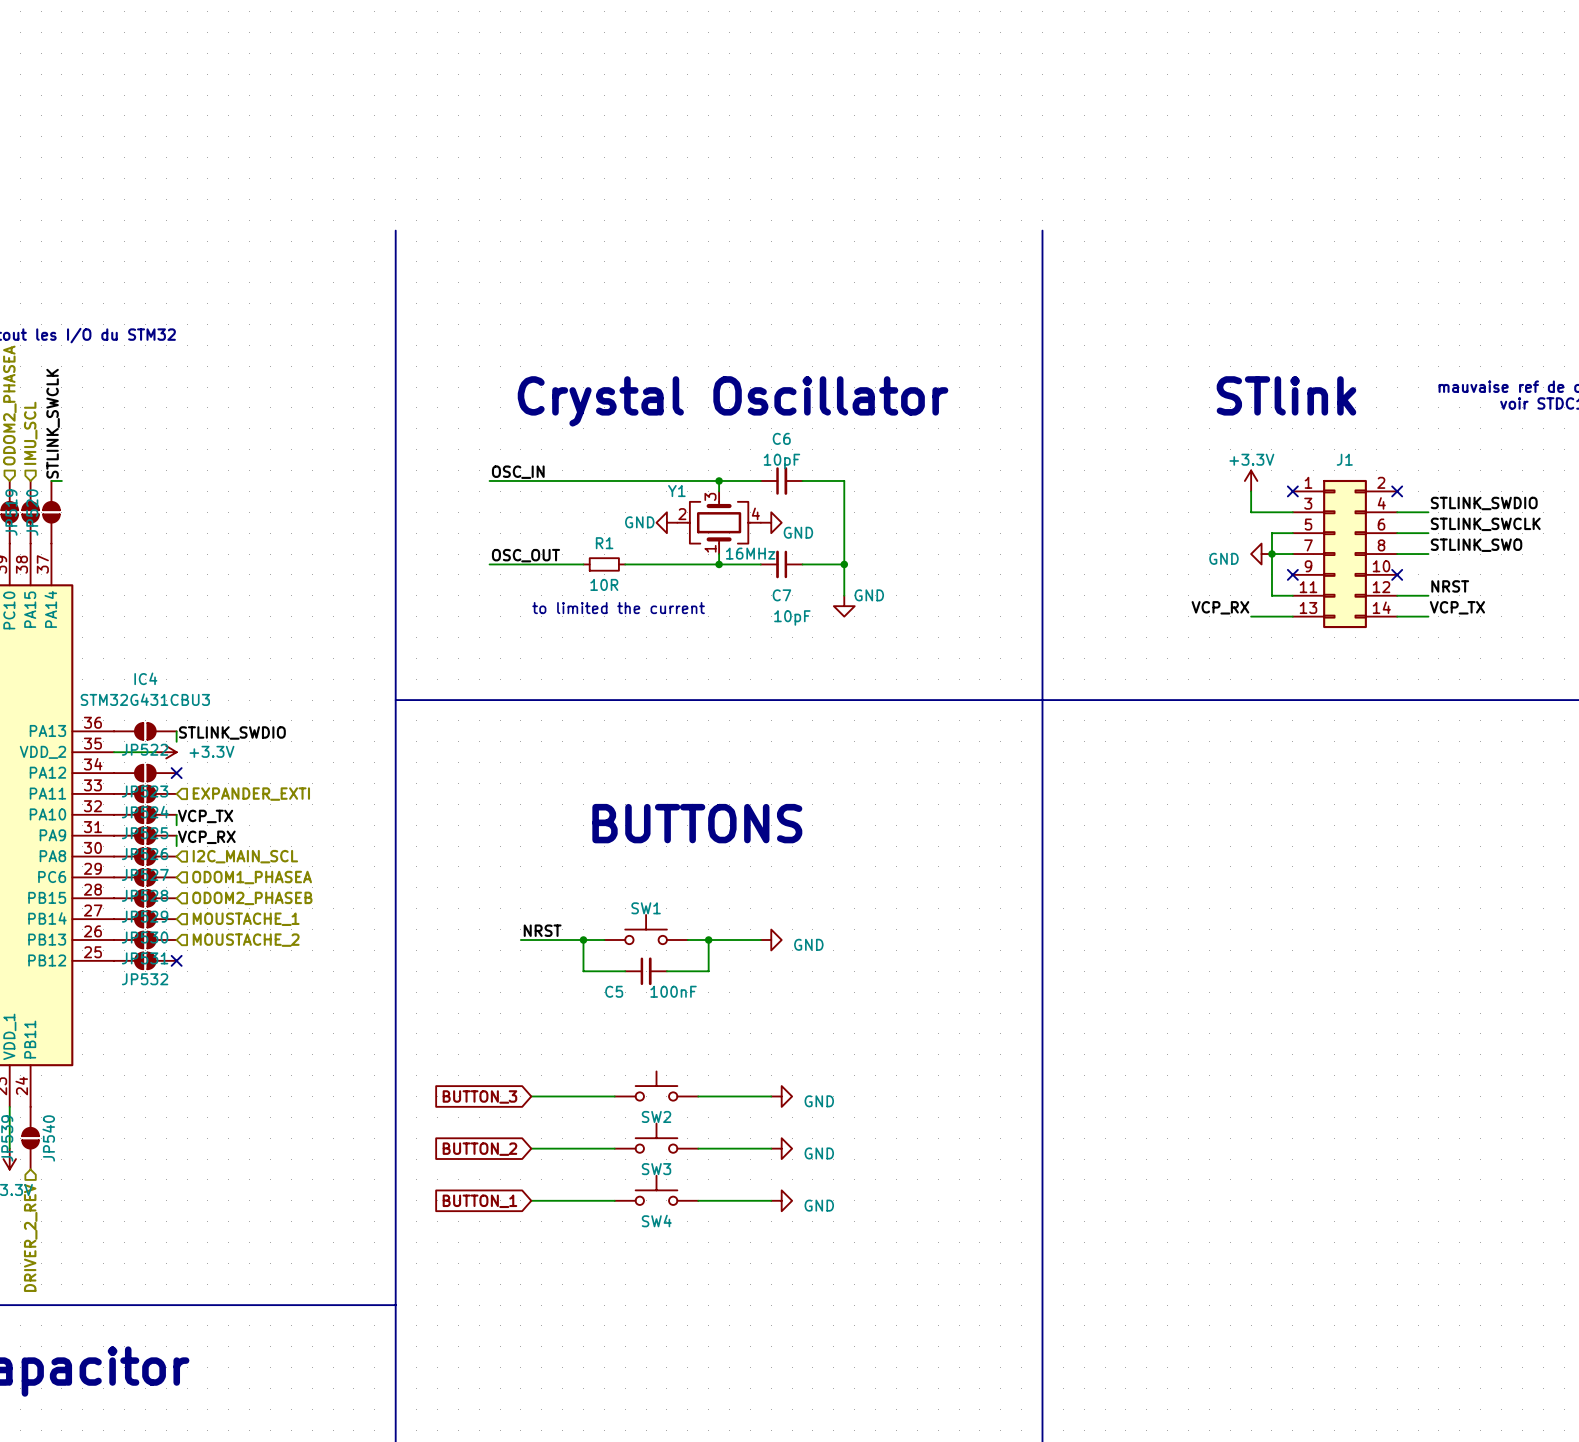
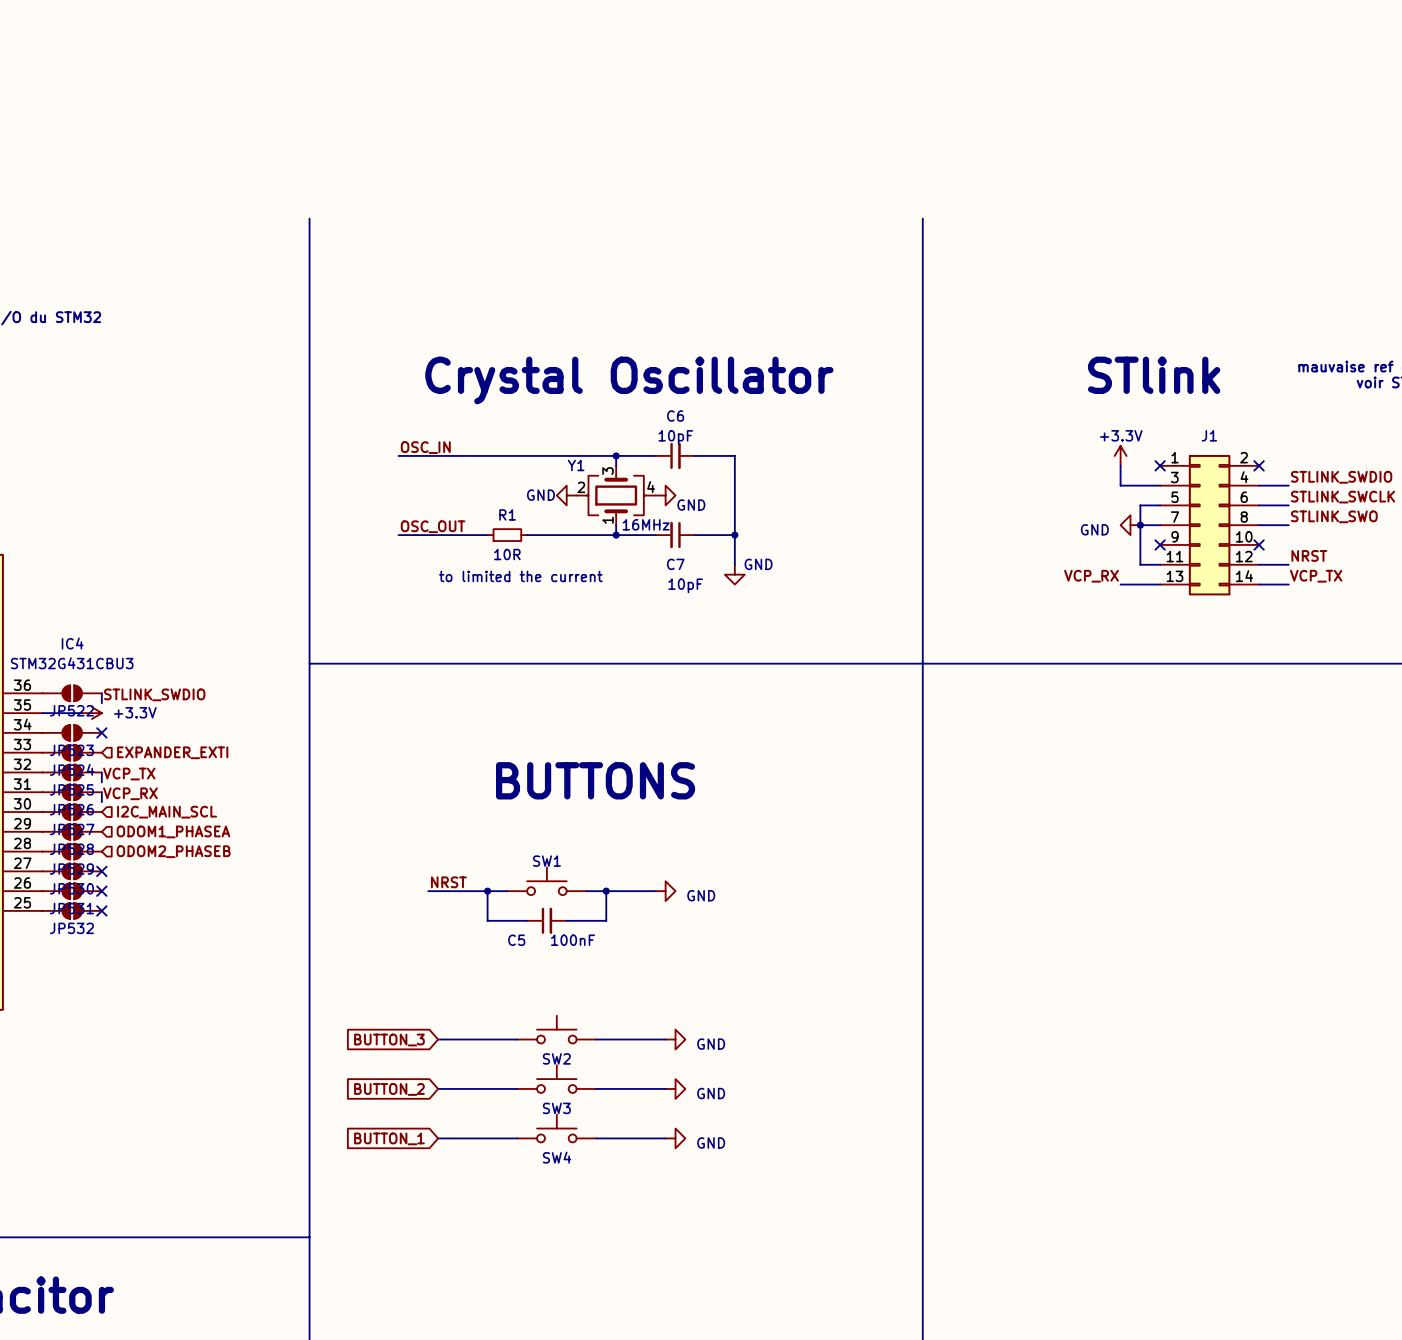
no-connect mark: none -> (101, 871)
hierarchical label: MOUSTACHE_1 (246, 919) -> none
no-connect mark: none -> (101, 891)
hierarchical label: MOUSTACHE_2 (246, 940) -> none

